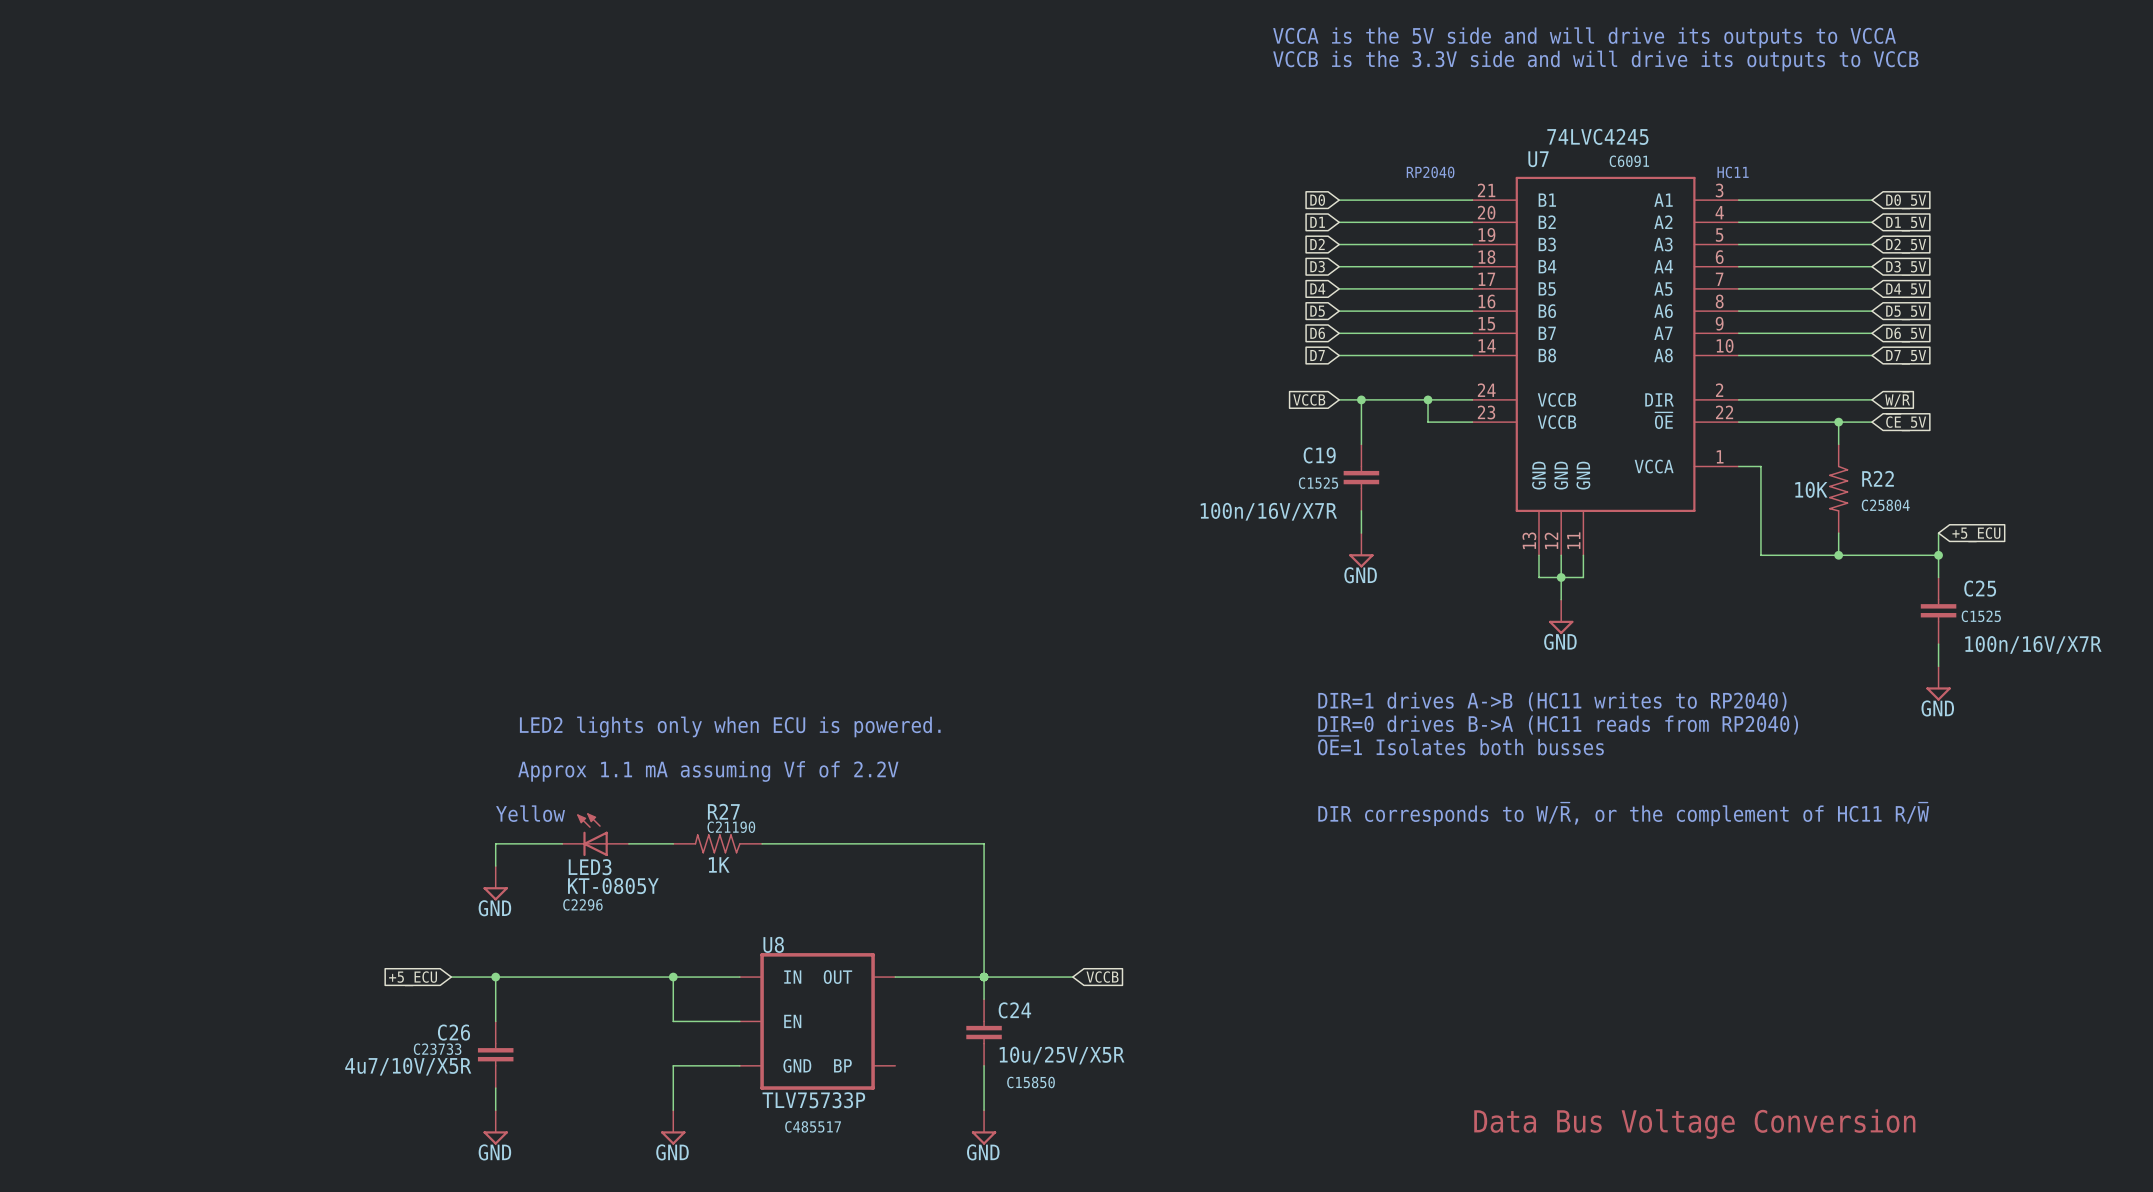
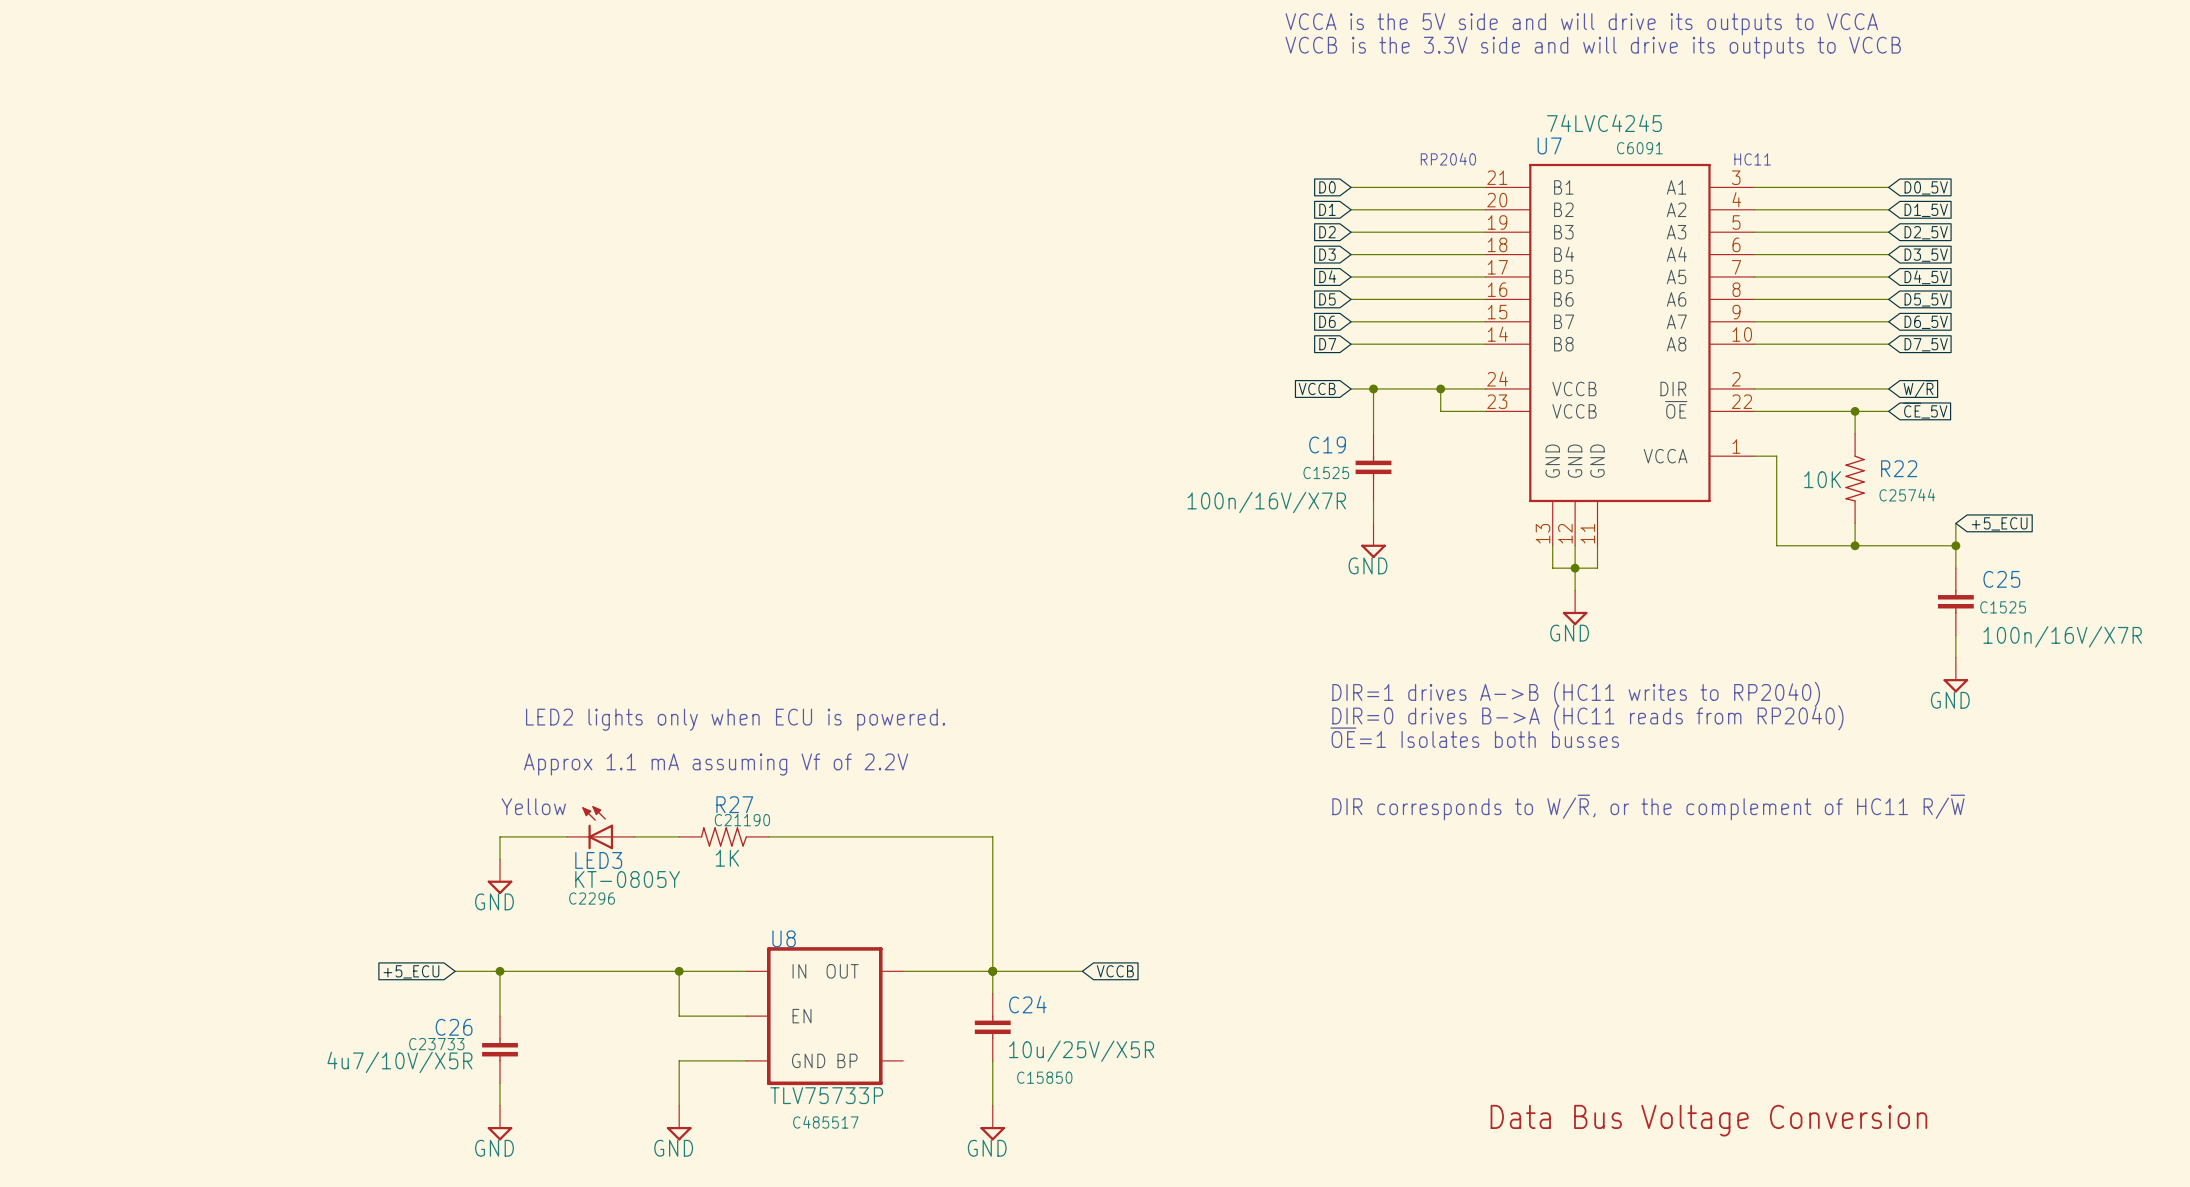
R22 text: C25804 (1885, 505) -> C25744 (1907, 495)

